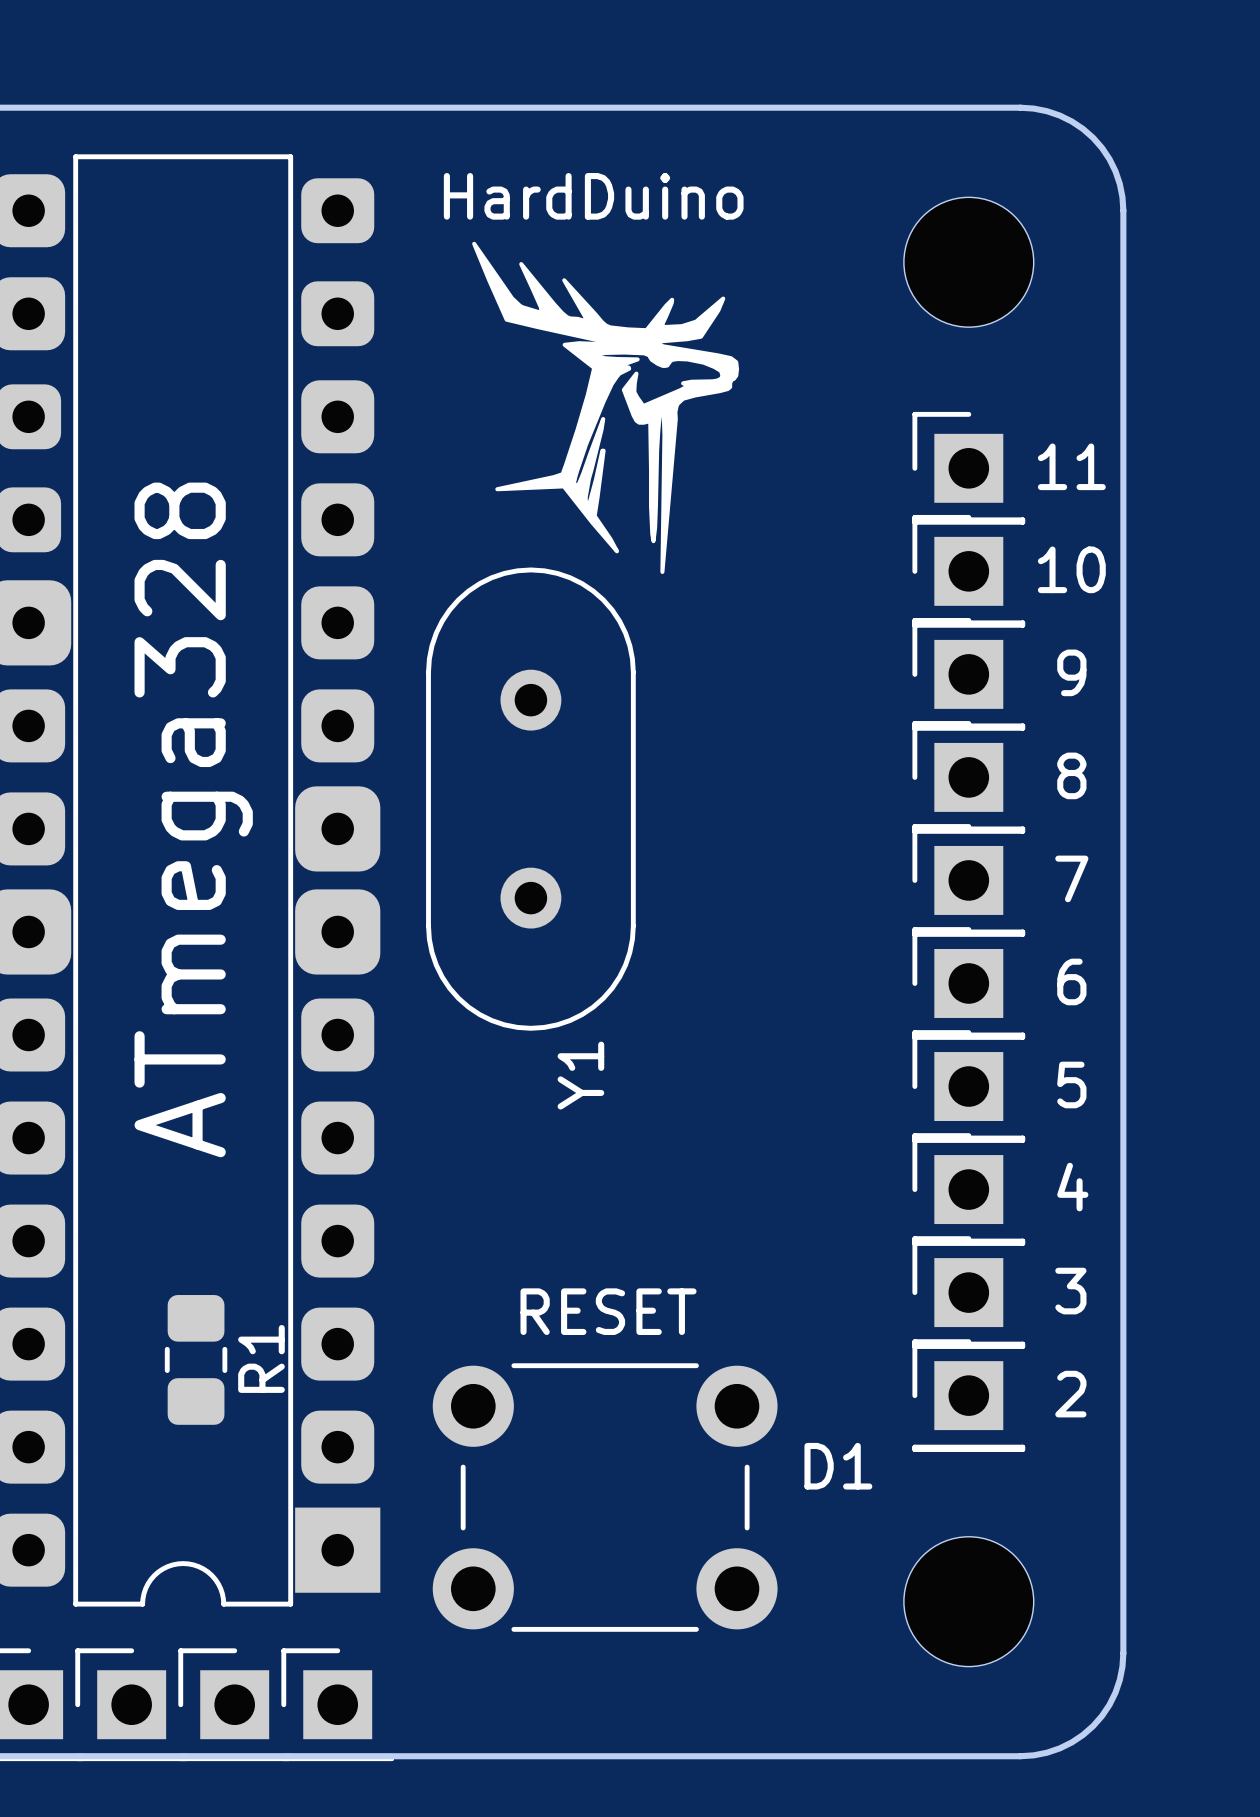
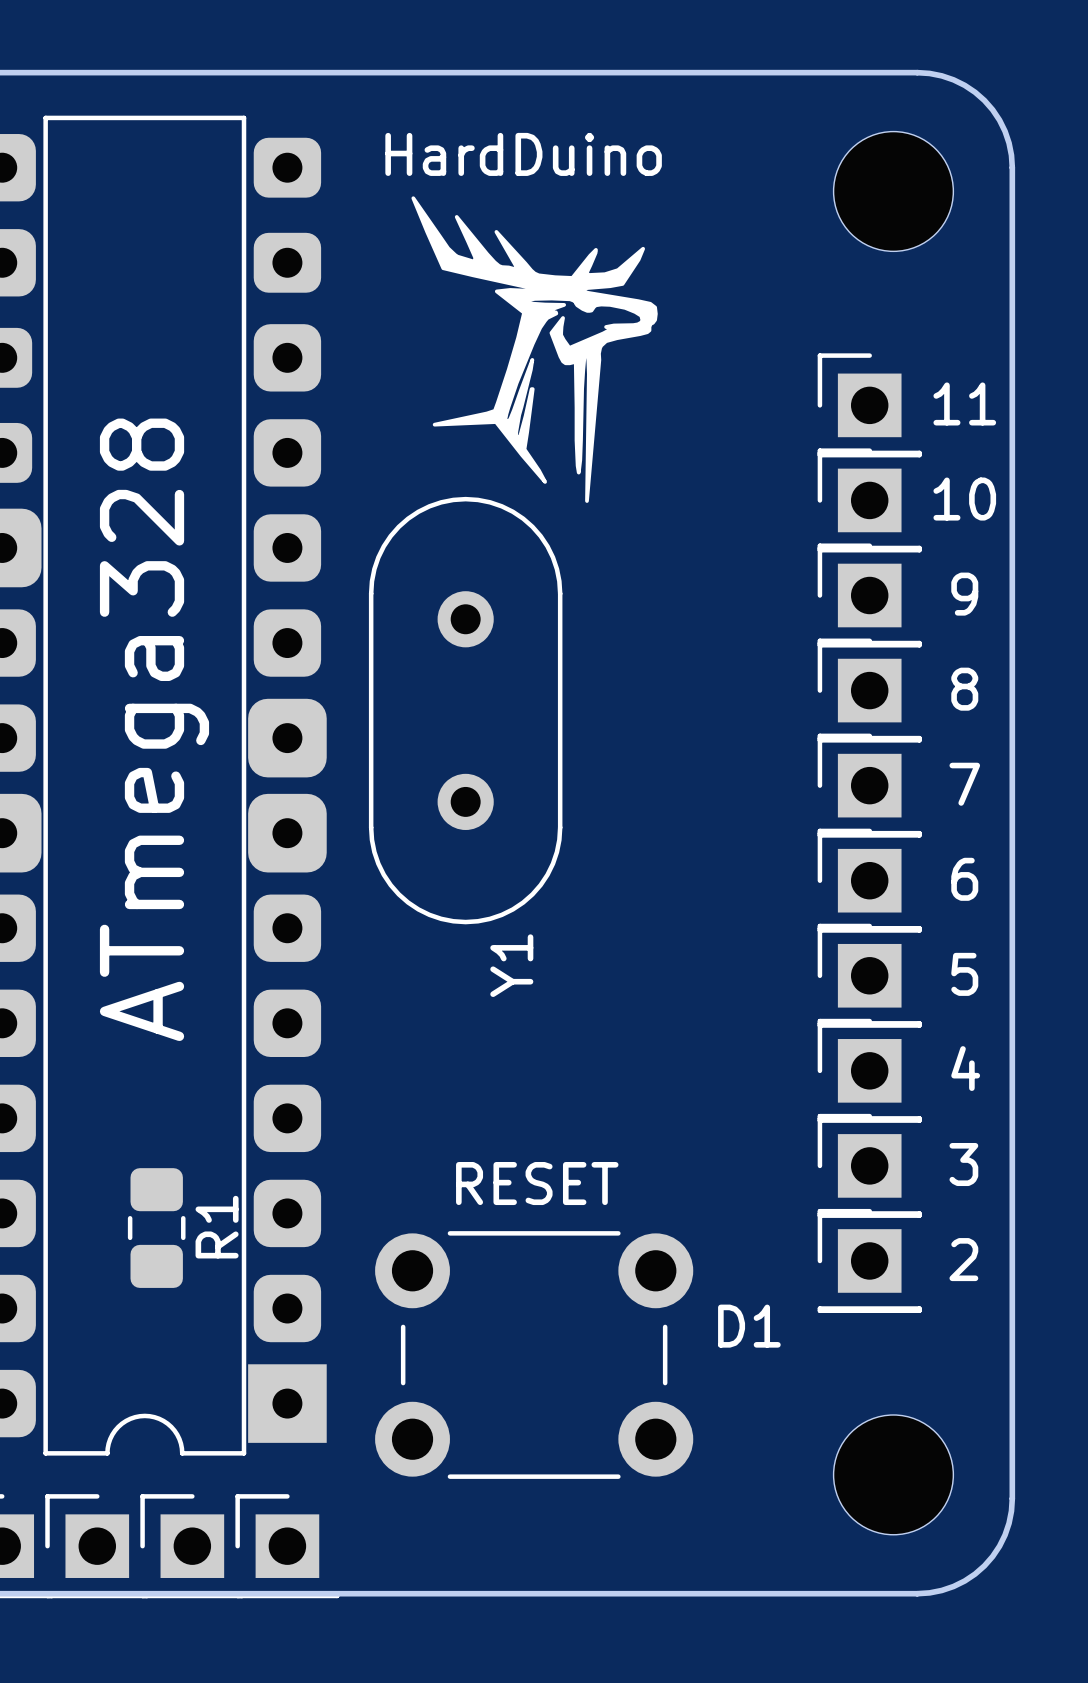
part position: (968, 262) -> (893, 191)
part position: (968, 1601) -> (893, 1474)

